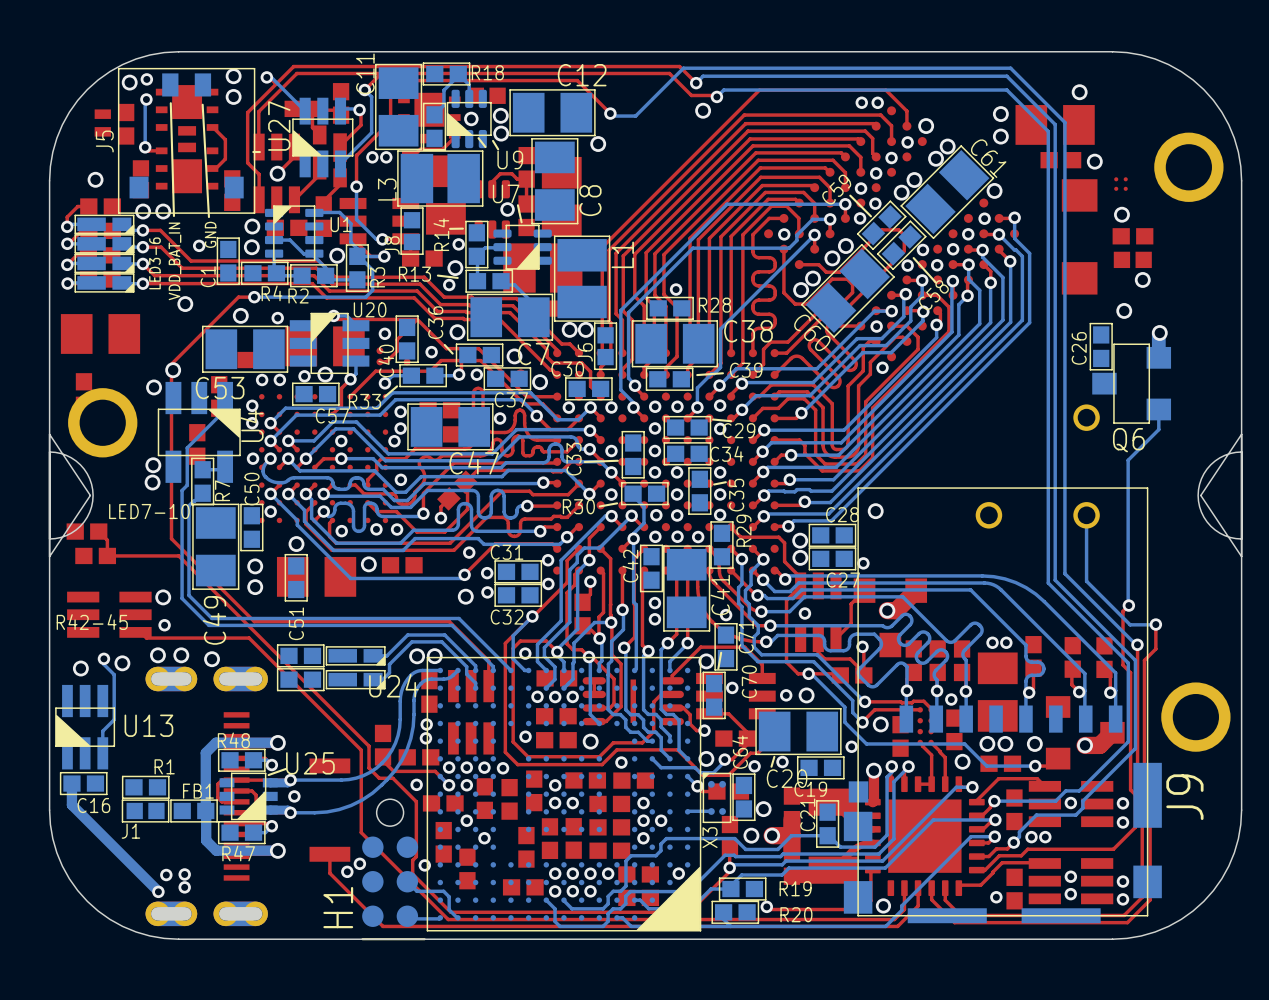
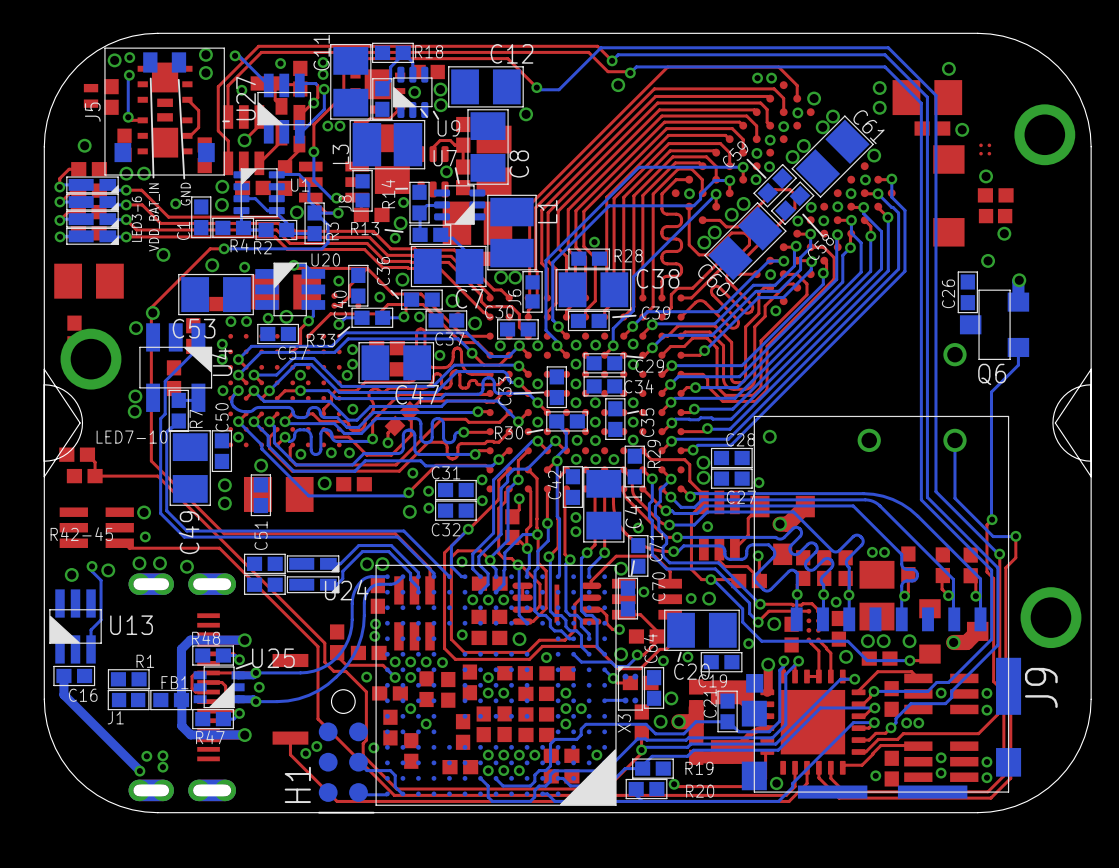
top track: (381, 73) (364, 90) -> none
via: none -> (323, 62)
via: none -> (280, 63)
bottom track: (364, 90) (371, 96) (371, 132) (340, 163) -> (324, 89) (324, 109) (299, 131)
via: (364, 90) -> none
via: none -> (323, 74)
via: (359, 109) -> none
via: none -> (324, 89)
via: none -> (241, 90)
via: none -> (313, 103)

